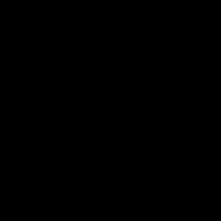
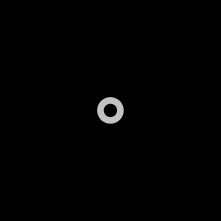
via: none -> (110, 110)

